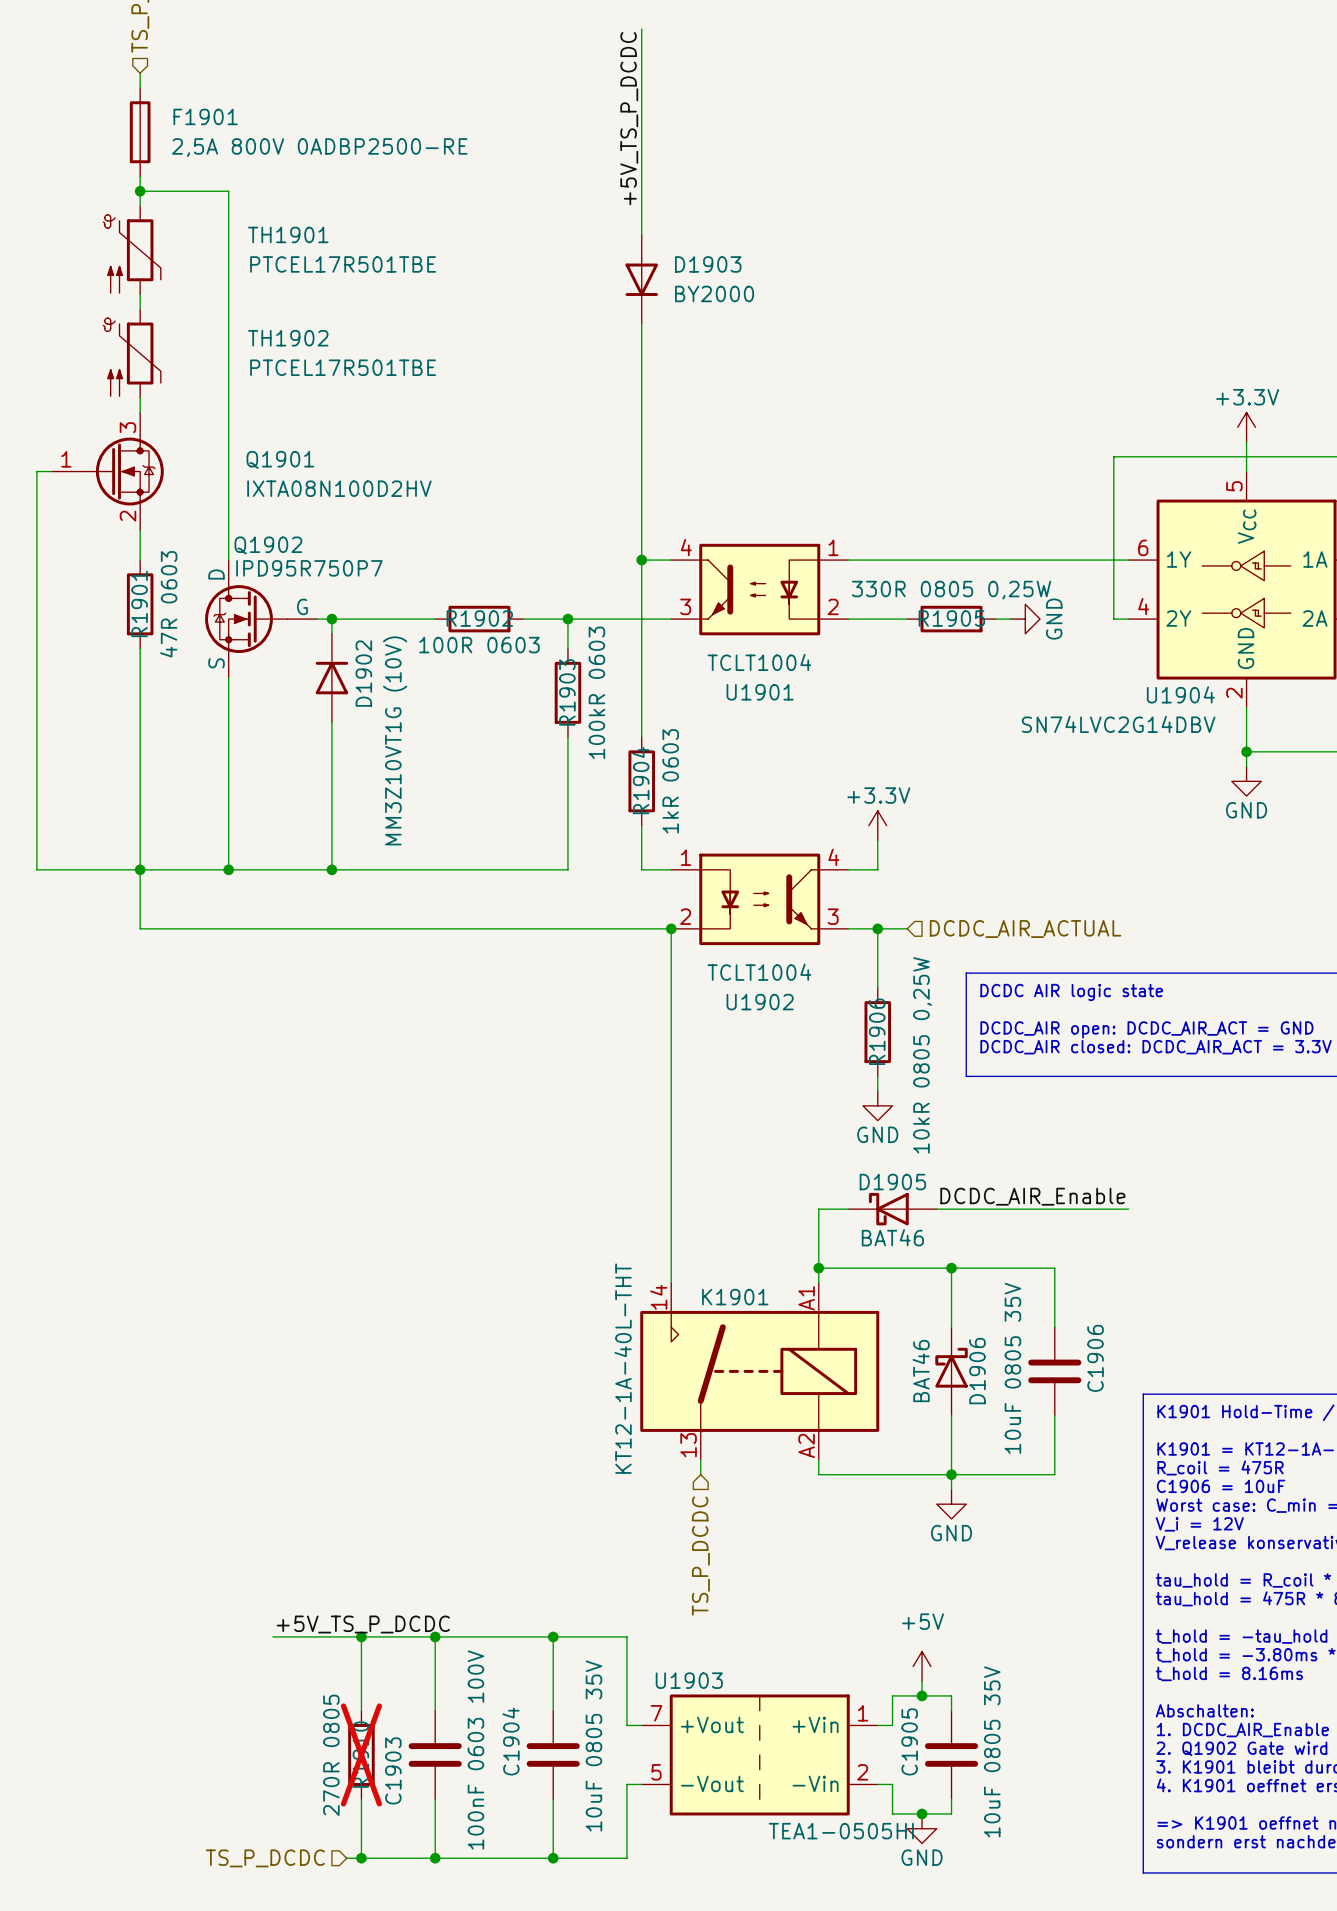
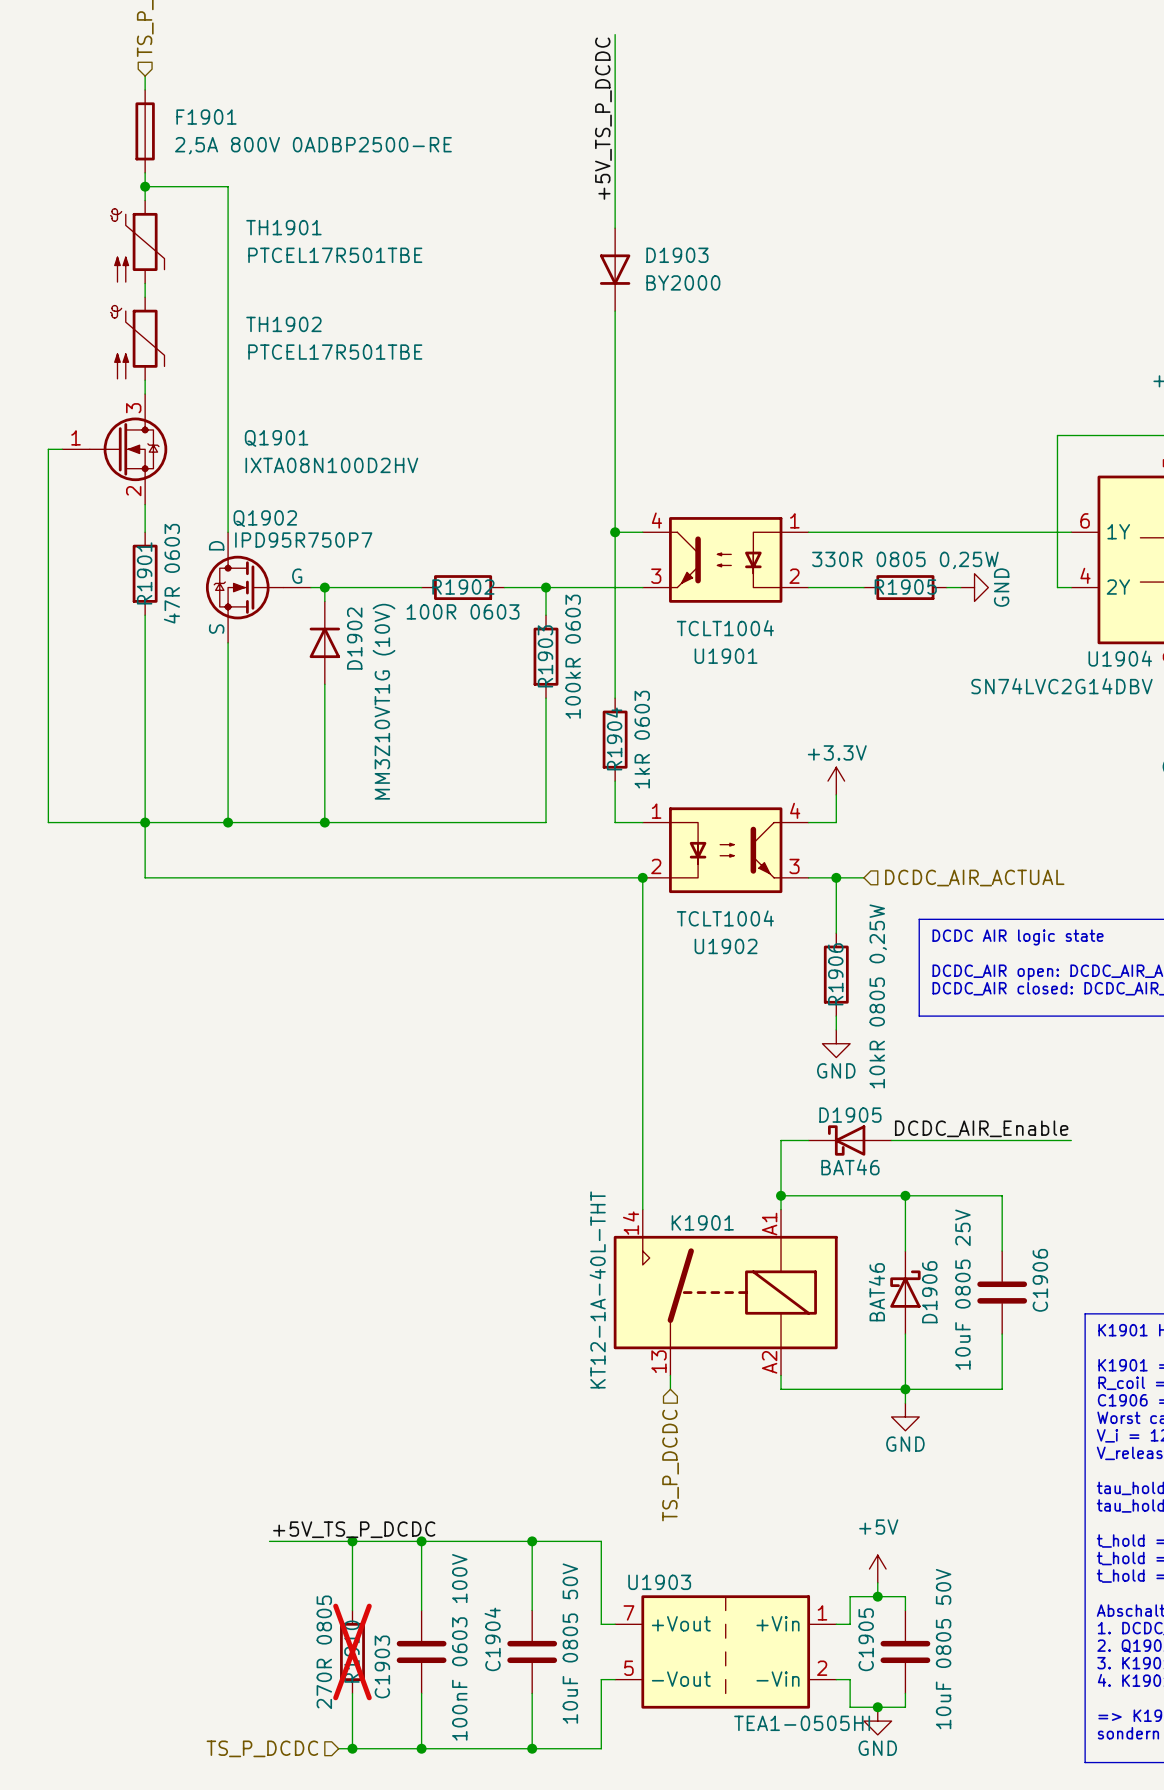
C1906 value: 10uF 0805 35V (1012, 1368) -> 10uF 0805 25V (962, 1289)
C1904 value: 10uF 0805 35V (593, 1746) -> 10uF 0805 50V (570, 1643)
C1905 value: 10uF 0805 35V (992, 1751) -> 10uF 0805 50V (943, 1649)

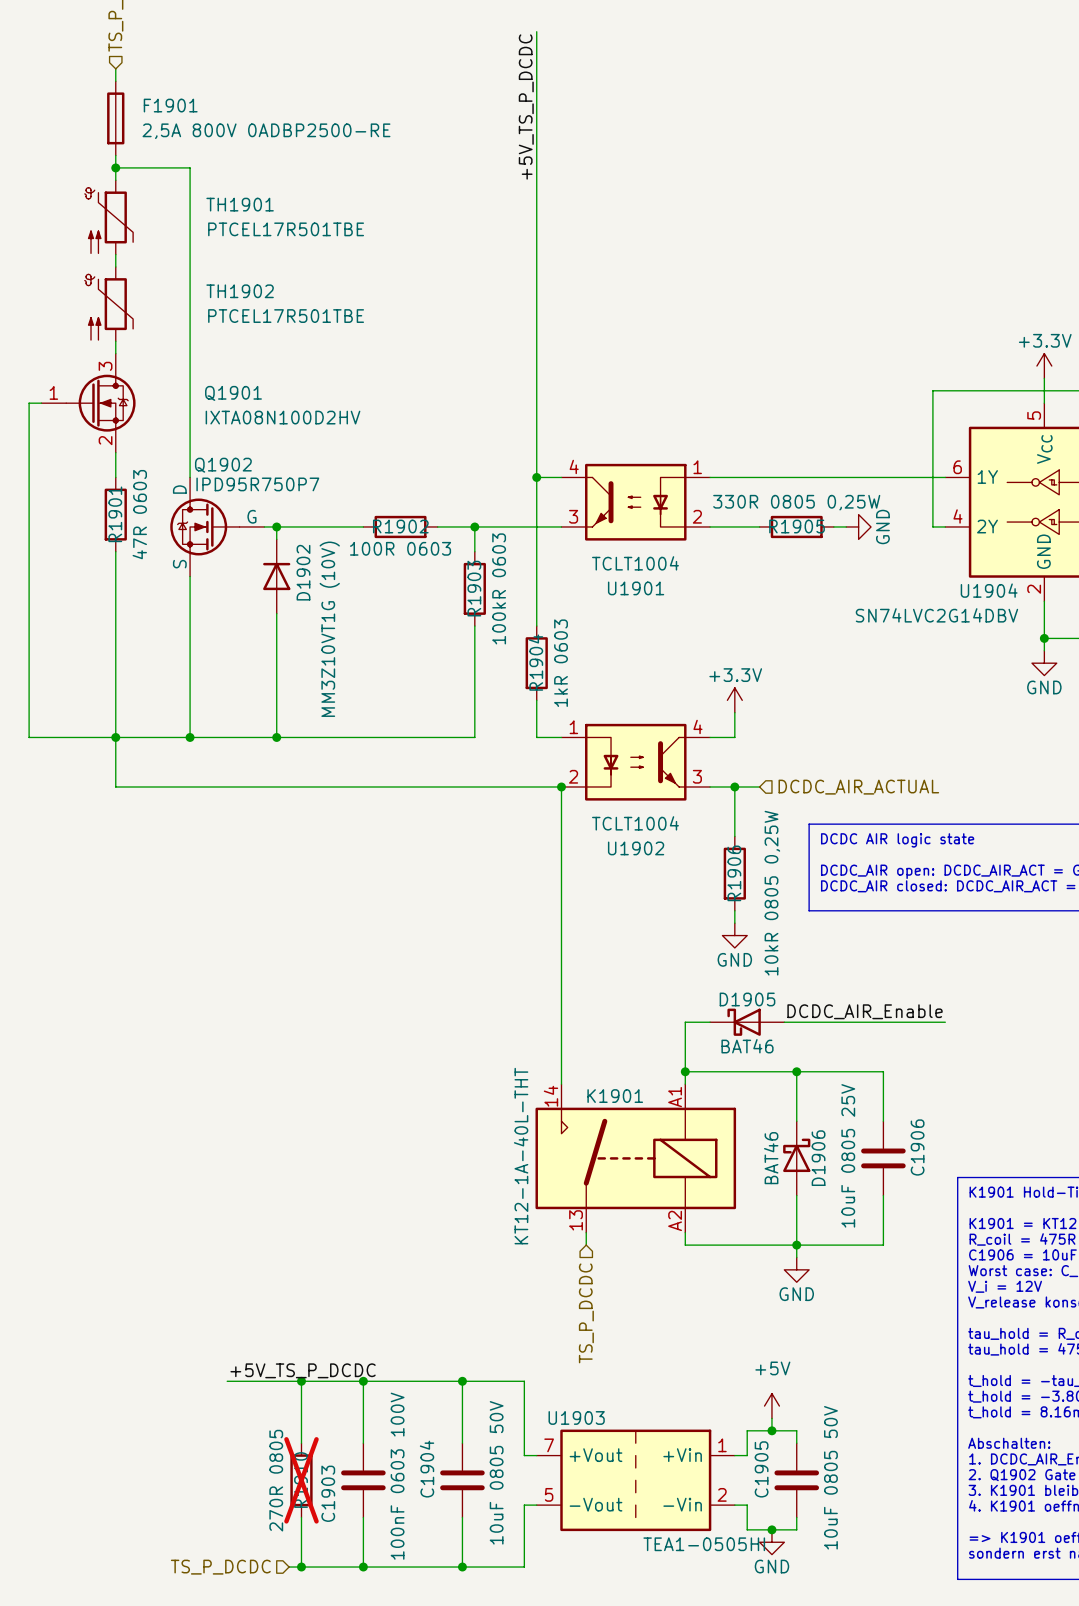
D1903: BY2000 (615, 269) -> none

